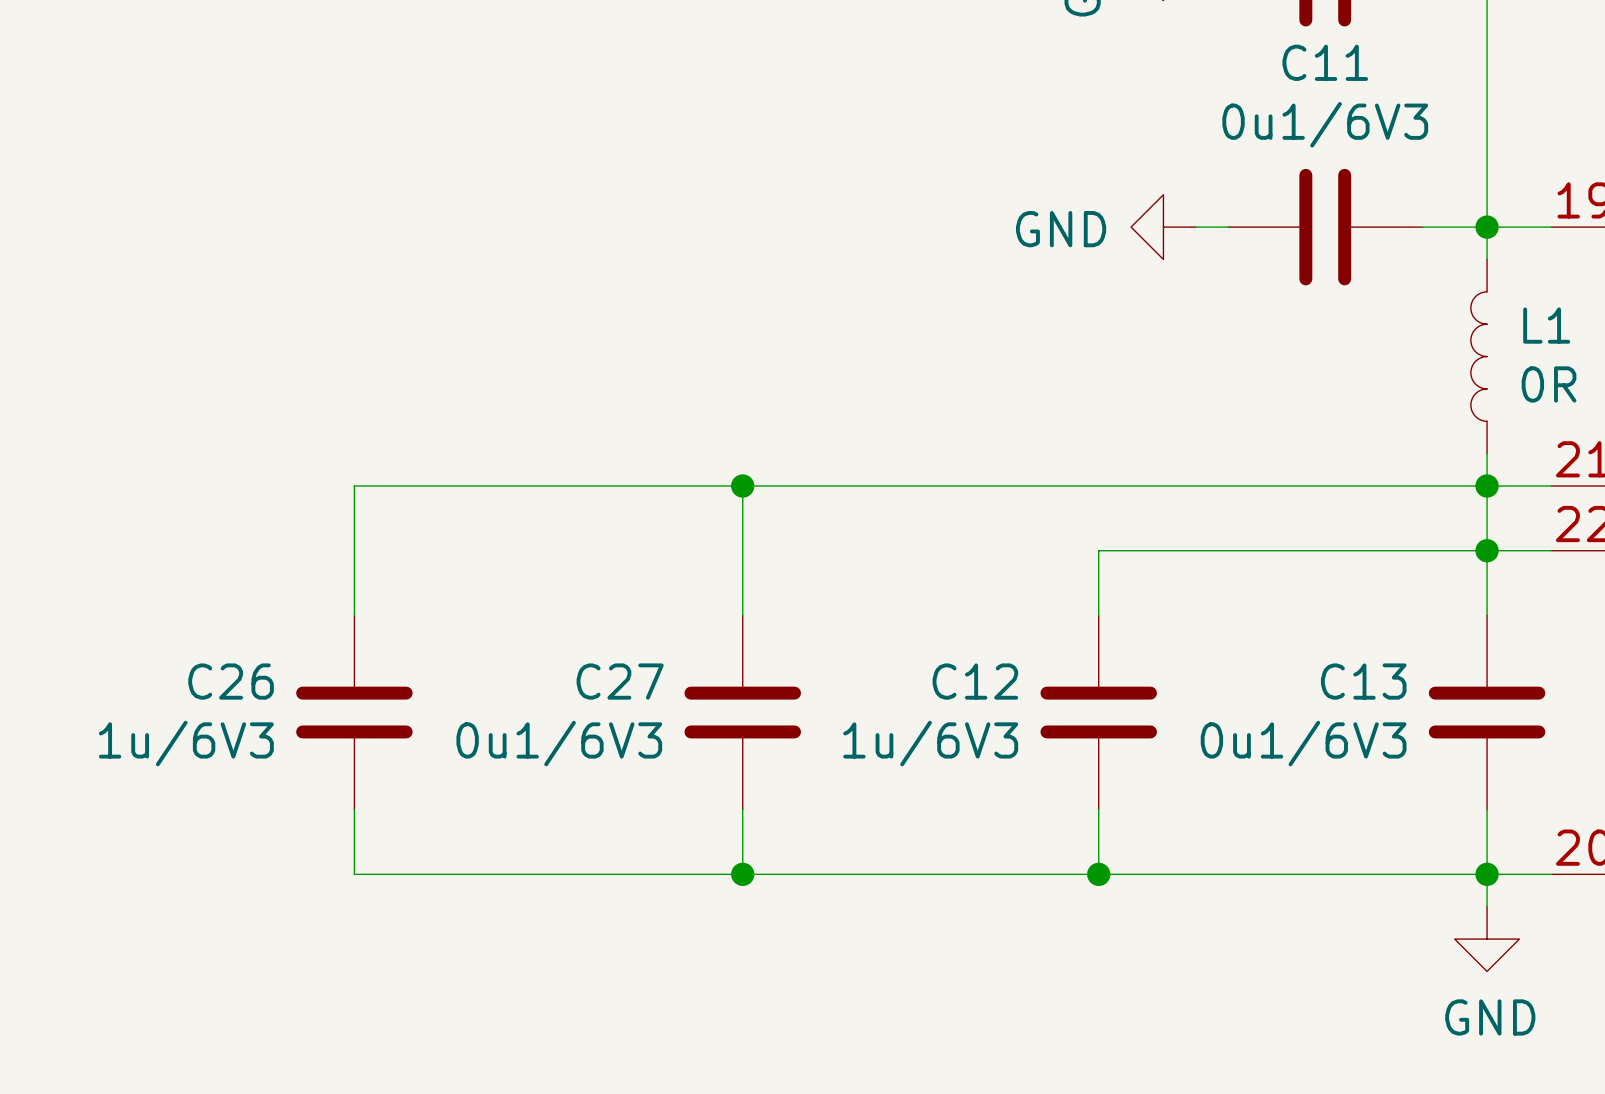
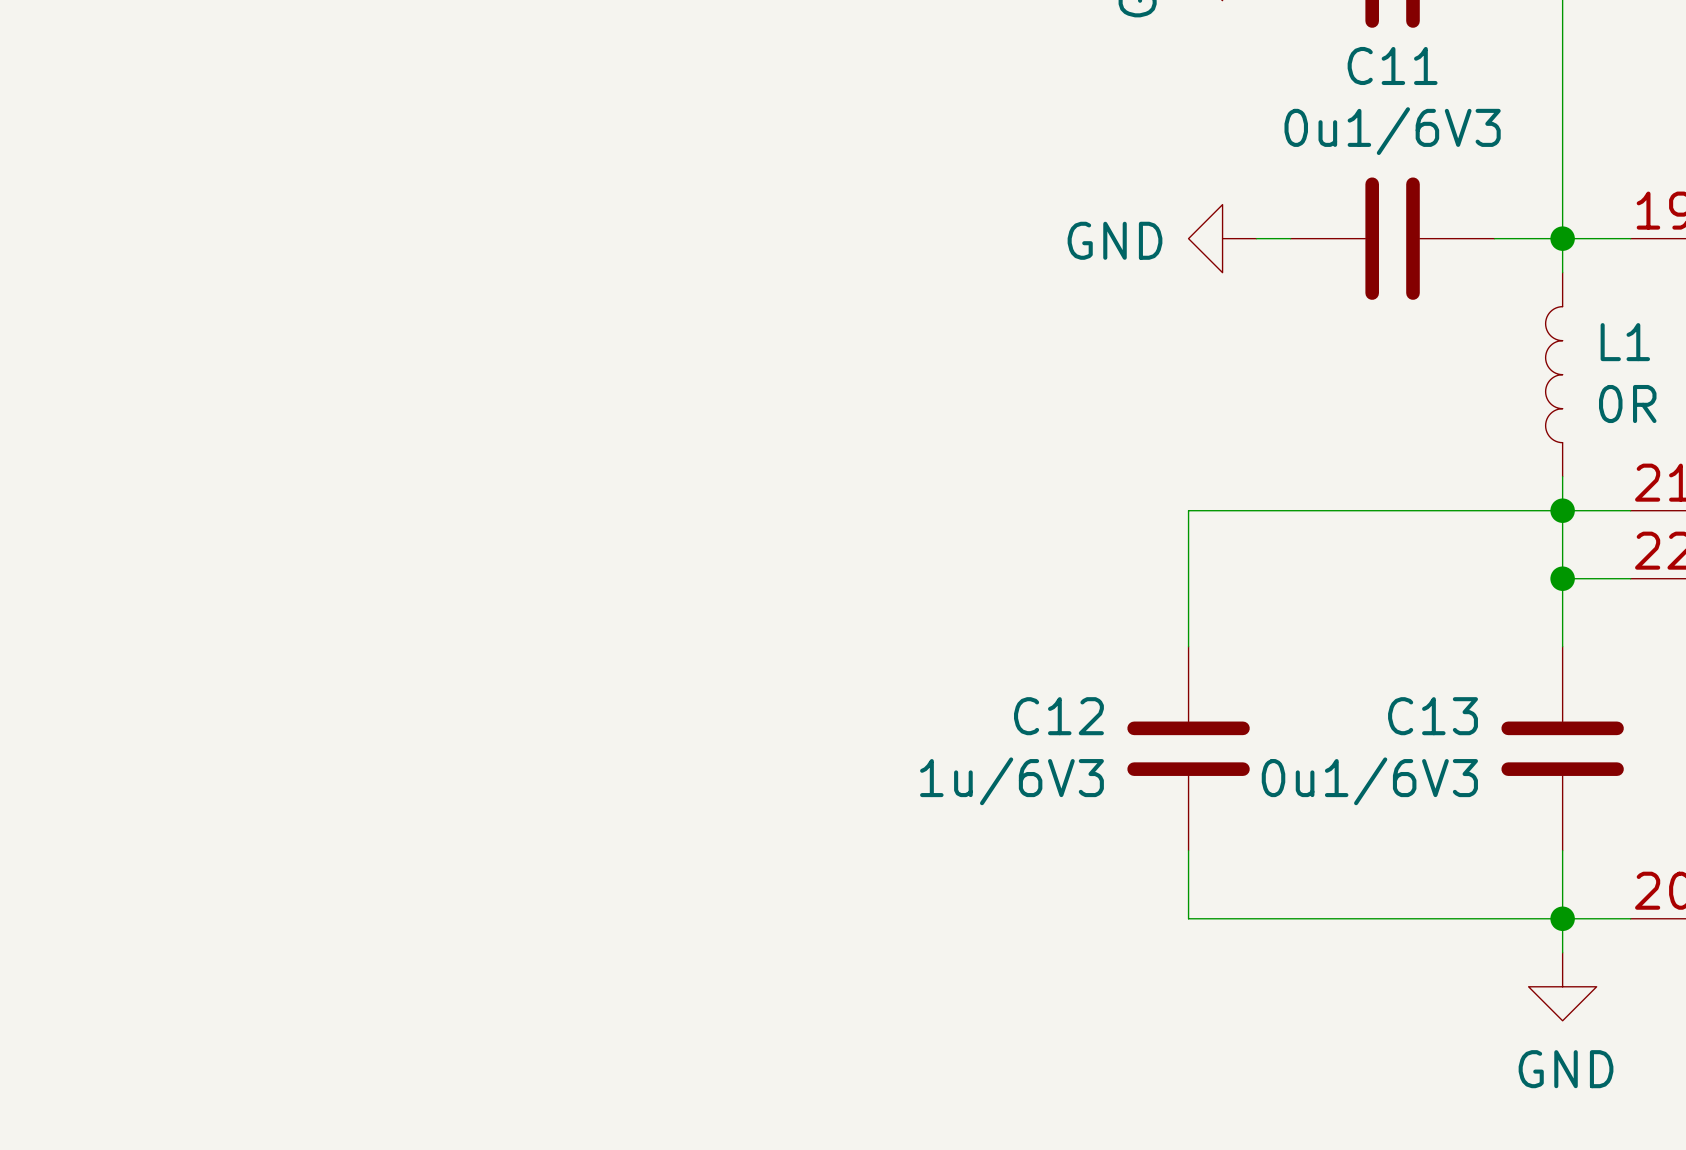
wire: (742, 486) (742, 615) -> none
junction: (742, 486) -> none
wire: (1131, 486) (354, 486) (354, 615) -> (1188, 510) (1188, 646)
wire: (1487, 550) (1098, 550) (1098, 615) -> none
C26: 1u/6V3 (354, 712) -> none
C27: 0u1/6V3 (742, 712) -> none
C12 position: (1098, 712) -> (1188, 748)
wire: (354, 809) (354, 874) (1131, 874) -> (1188, 850) (1188, 918)
wire: (742, 809) (742, 874) -> none
wire: (1098, 809) (1098, 874) -> none
junction: (742, 874) -> none
junction: (1098, 874) -> none

